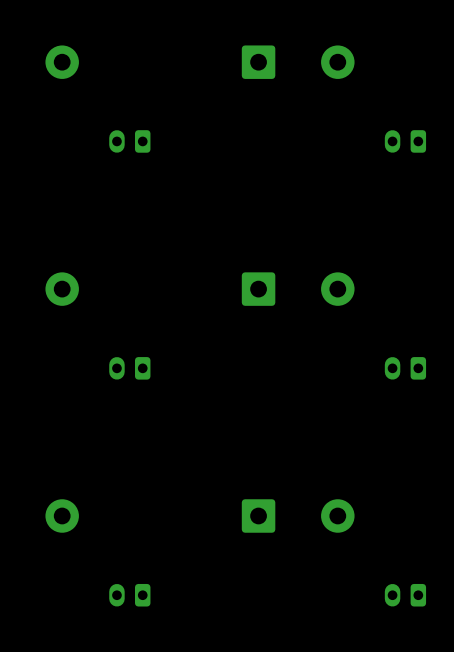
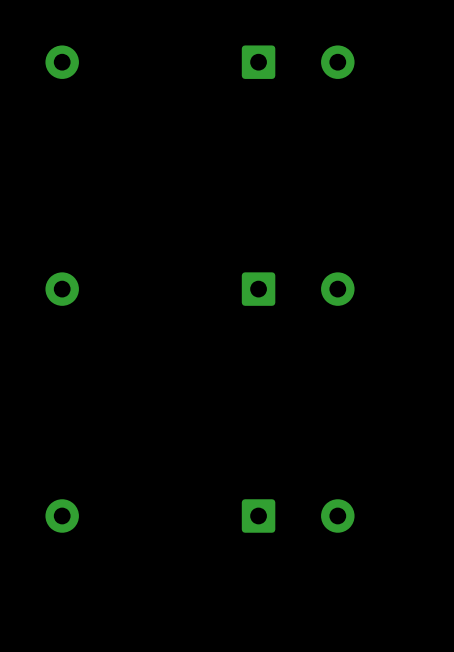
part: (129, 141) -> none
part: (405, 141) -> none
part: (129, 368) -> none
part: (405, 368) -> none
part: (129, 595) -> none
part: (405, 595) -> none

